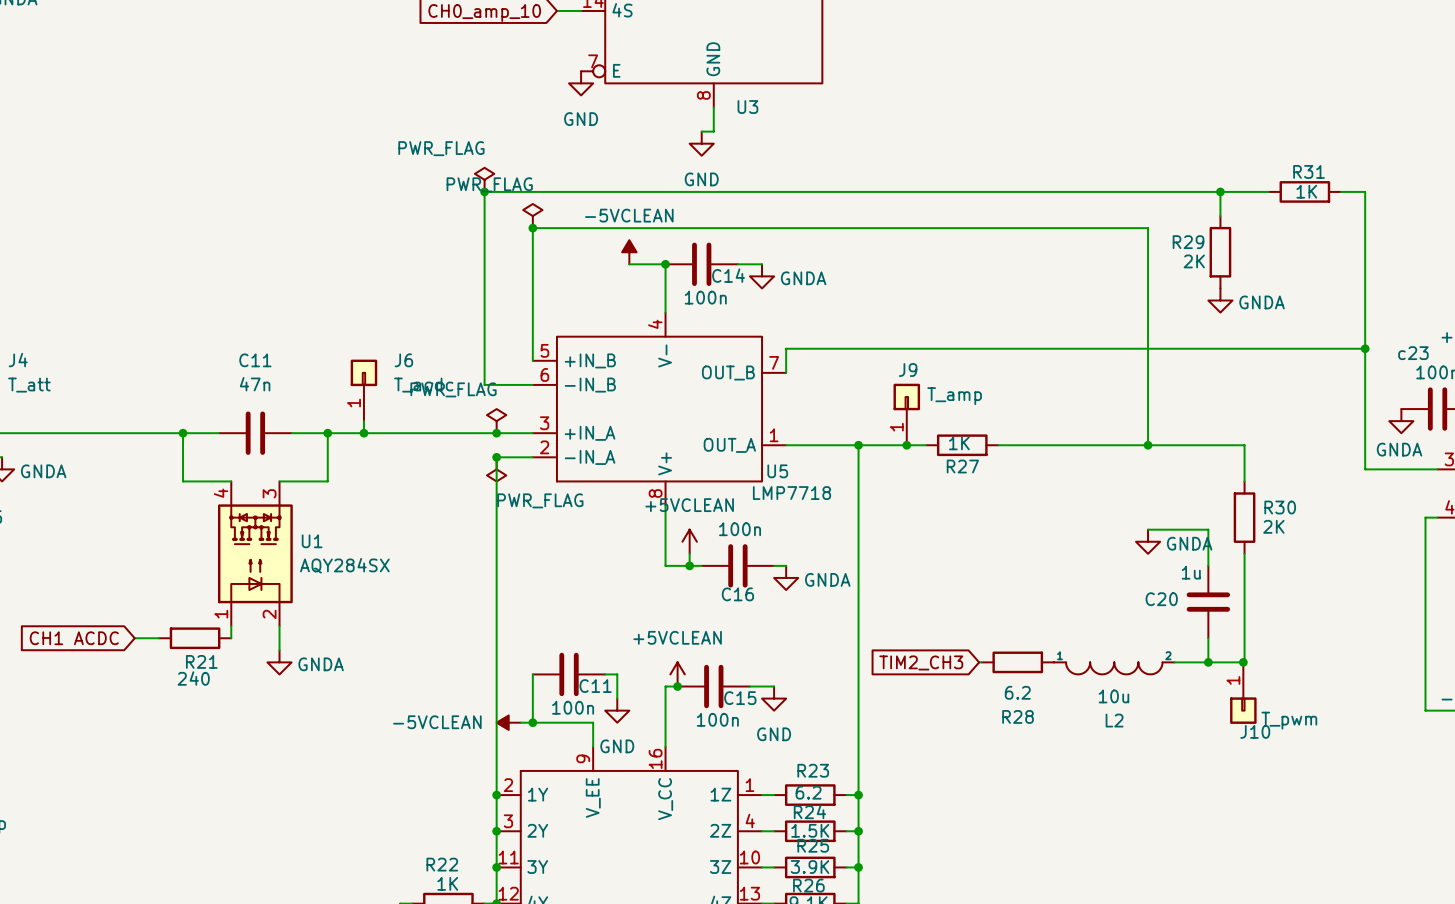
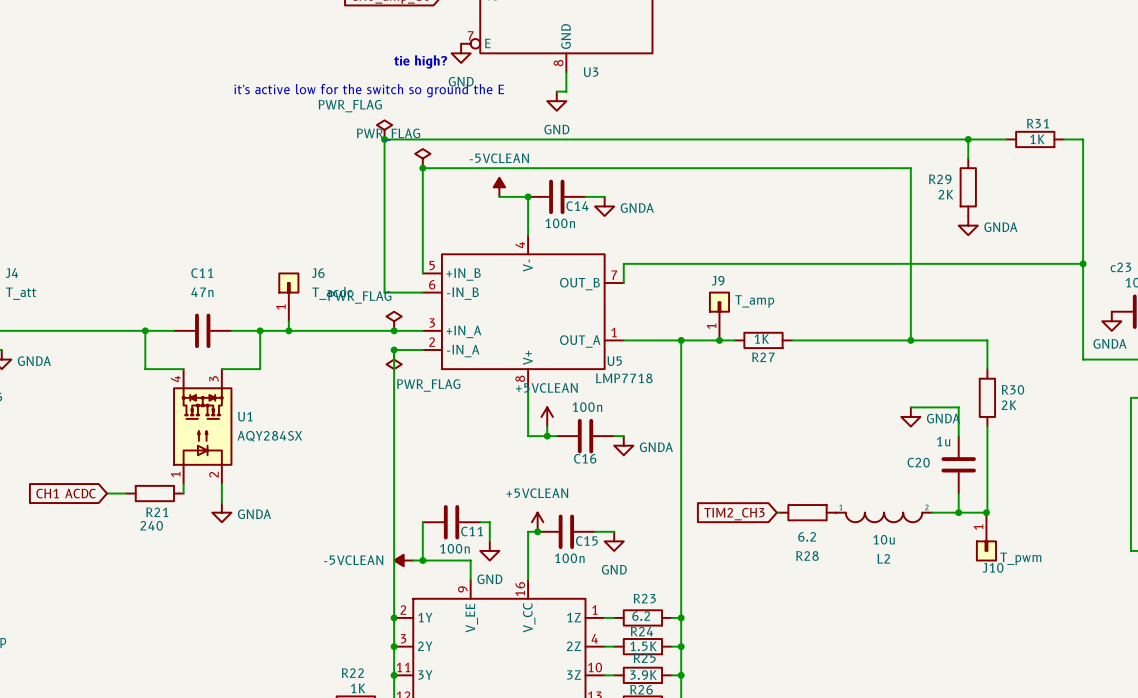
text: none -> tie high? (420, 61)
text: none -> it's active low for the switch so ground the E (369, 90)

